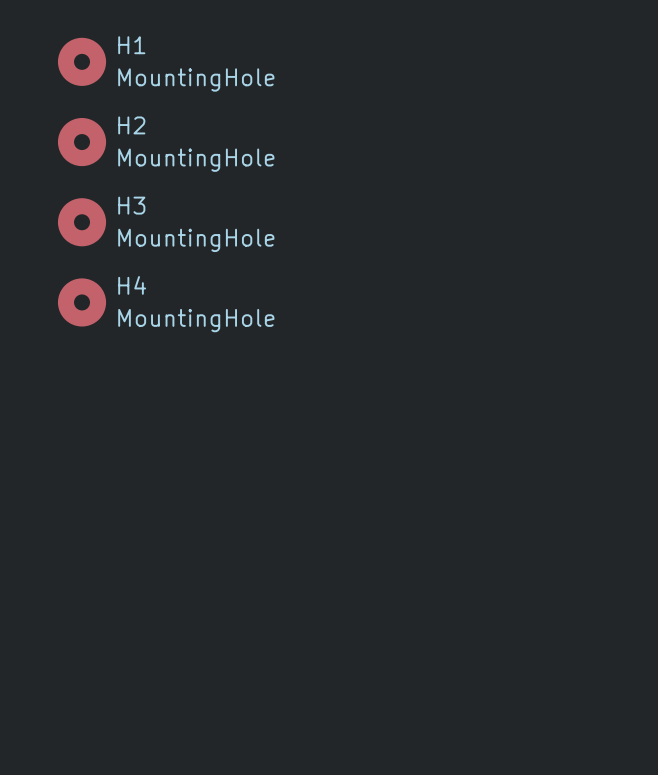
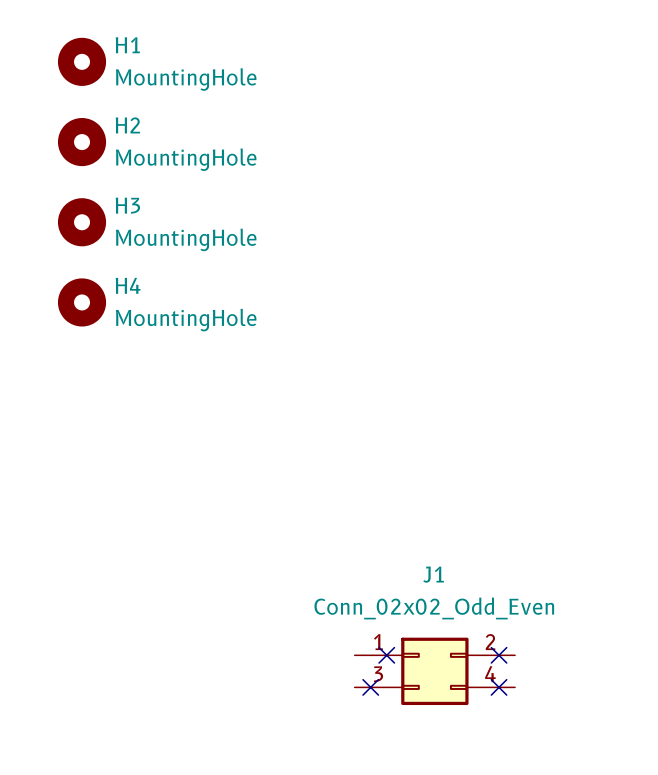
no-connect mark: none -> (386, 655)
no-connect mark: none -> (499, 655)
J1: none -> Conn_02x02_Odd_Even (434, 671)
no-connect mark: none -> (370, 687)
no-connect mark: none -> (499, 687)

